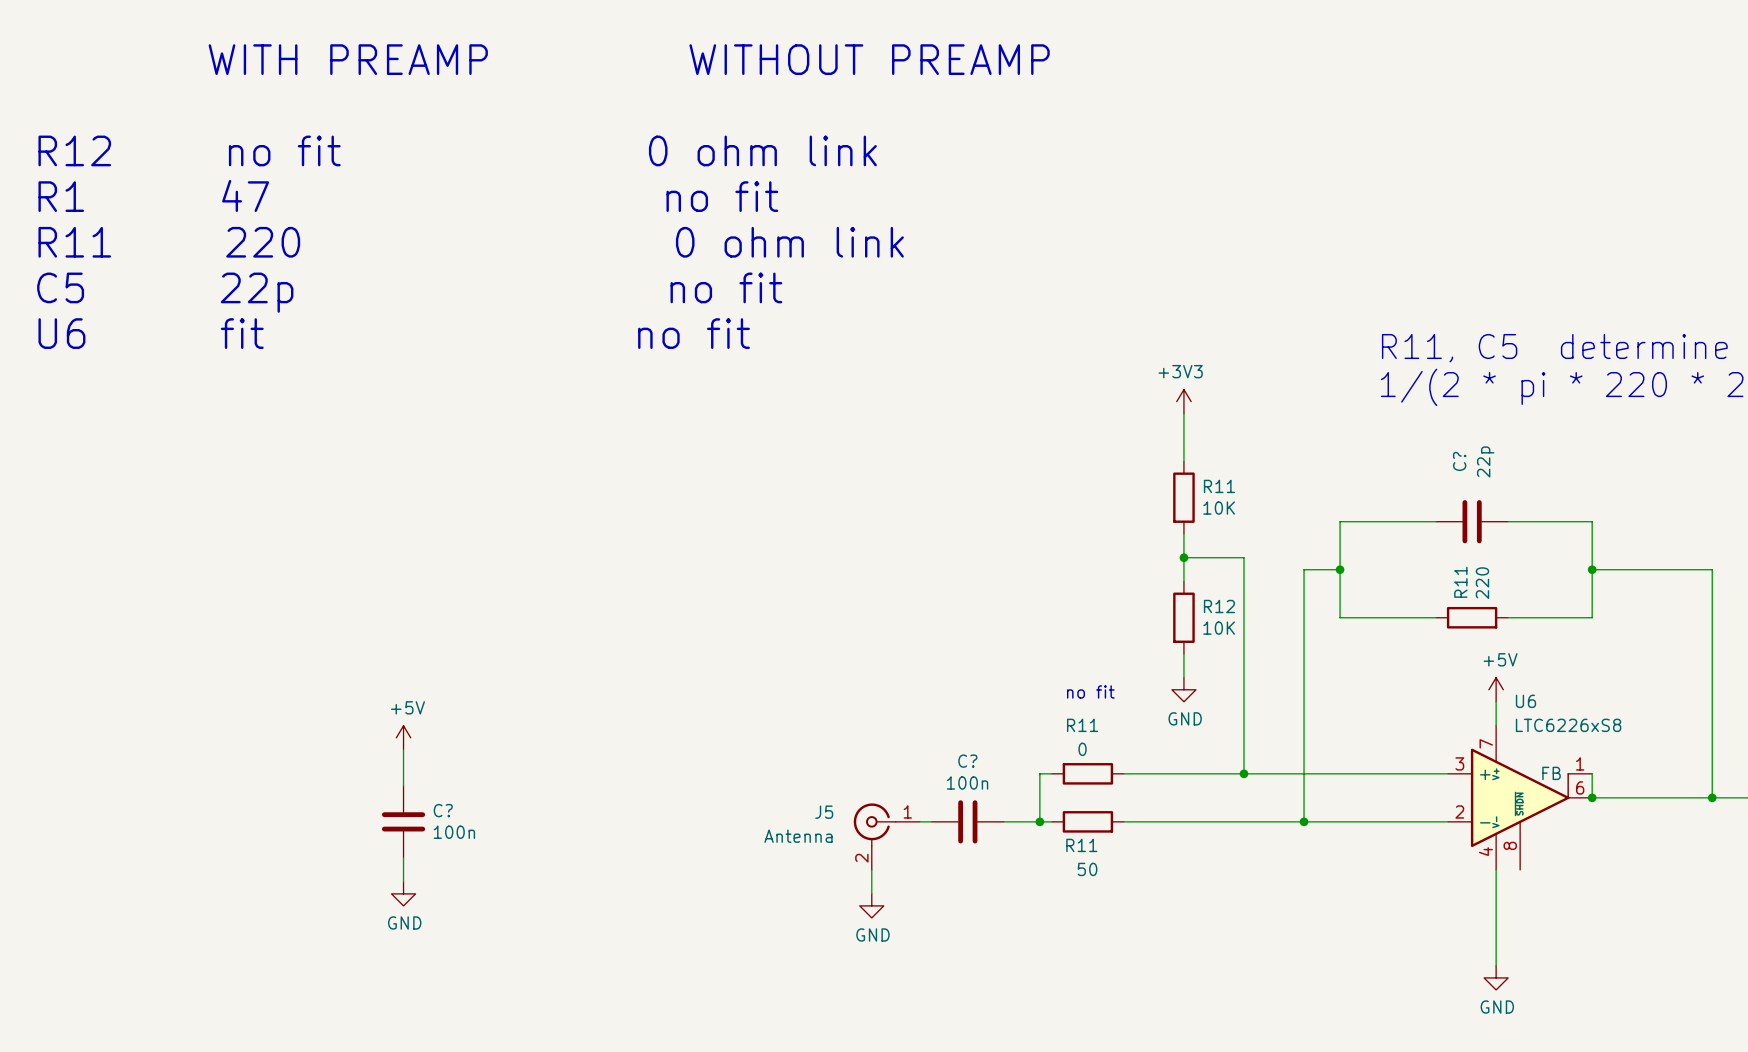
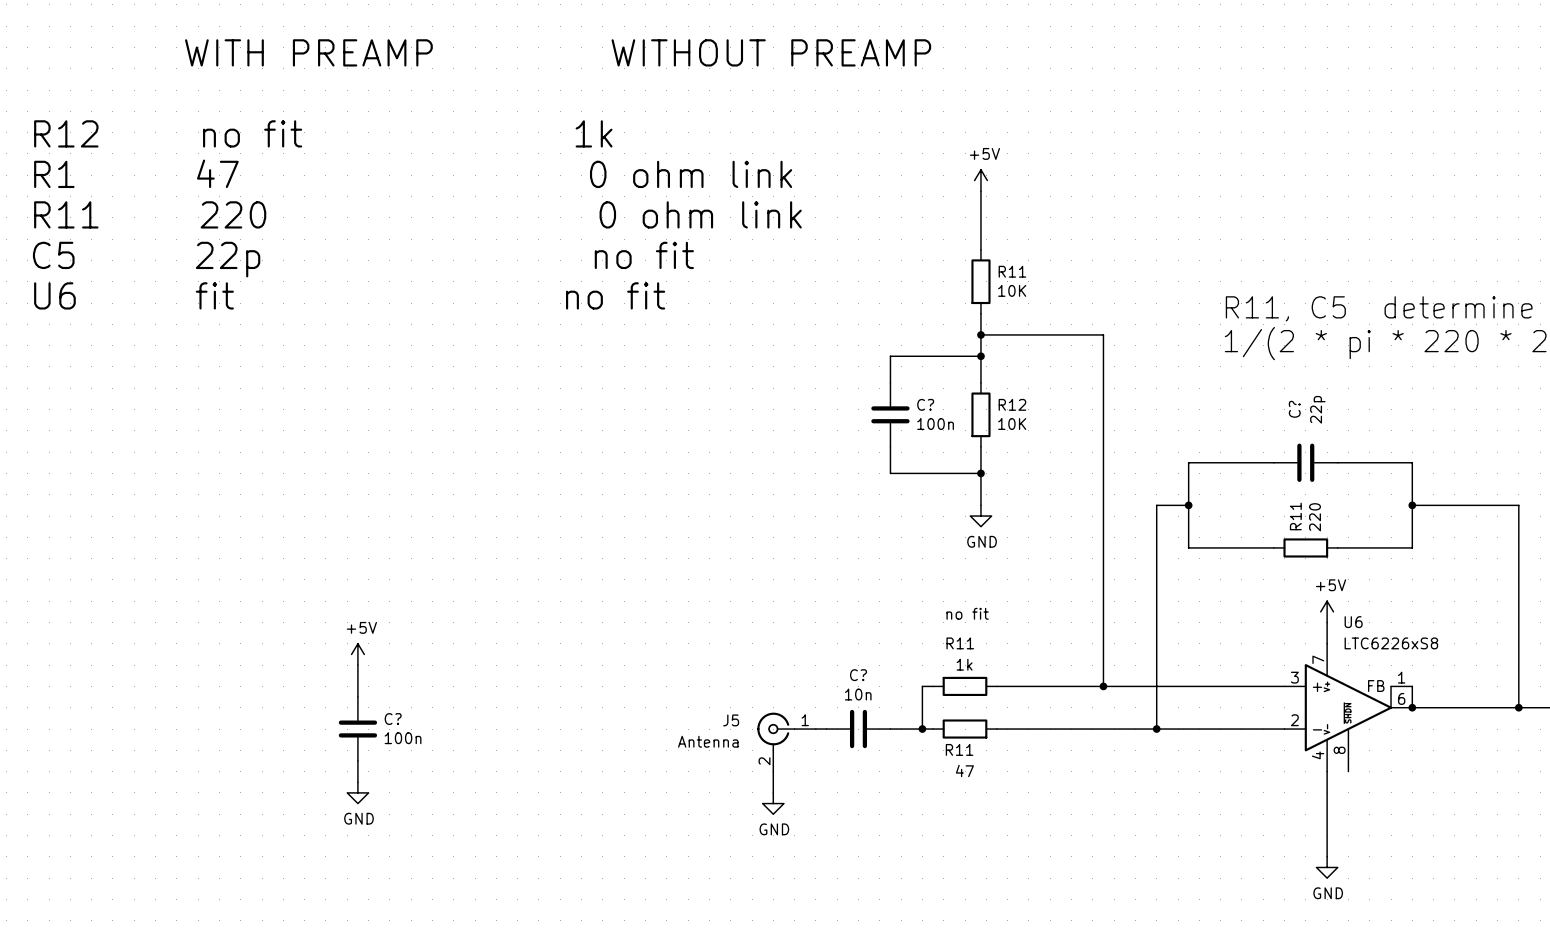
text: R12 no fit 0 ohm link (457, 150) -> R12 no fit 1k (323, 133)
text: R1 47 no fit (408, 195) -> R1 47 0 ohm link (413, 173)
power symbol: none -> +5V (980, 180)
wire: none -> (980, 191) (980, 249)
wire: none -> (980, 313) (980, 382)
junction: none -> (980, 334)
wire: none -> (980, 356) (890, 356) (890, 382)
junction: none -> (980, 356)
power symbol: +3V3 (1183, 401) -> none
wire: (1183, 413) (1183, 461) -> none
C?: none -> 100n (890, 414)
R11 position: (1183, 497) -> (980, 281)
wire: none -> (890, 446) (890, 473) (980, 473)
wire: none -> (980, 446) (980, 505)
junction: none -> (980, 473)
wire: (1183, 533) (1183, 581) -> none
wire: (1183, 557) (1243, 557) -> (980, 334) (1103, 334) (1103, 494)
junction: (1183, 557) -> none
R12 position: (1183, 617) -> (980, 414)
wire: (1183, 653) (1183, 677) -> none
power symbol position: GND (1183, 689) -> GND (980, 516)
R11 value: 0 (1082, 749) -> 1k (964, 664)
C? value: 100n (967, 782) -> 10n (858, 694)
R11 value: 50 (1087, 869) -> 47 (964, 770)

